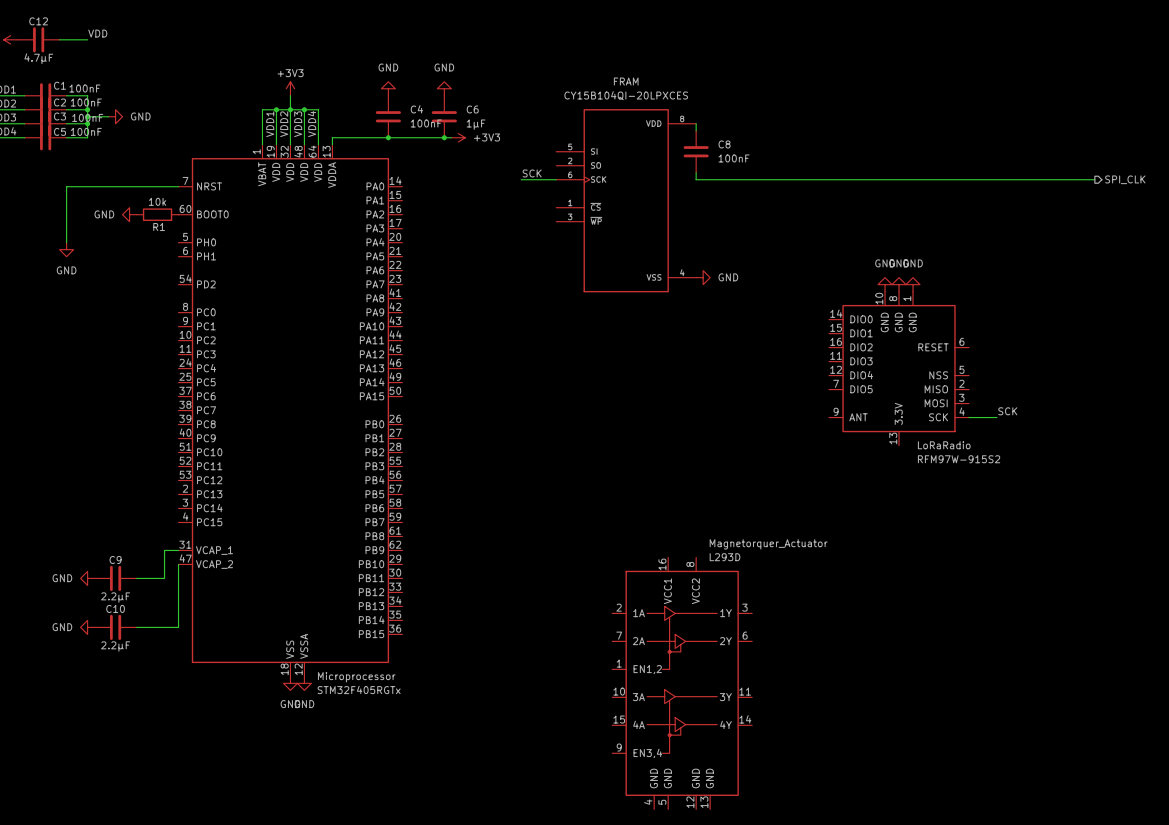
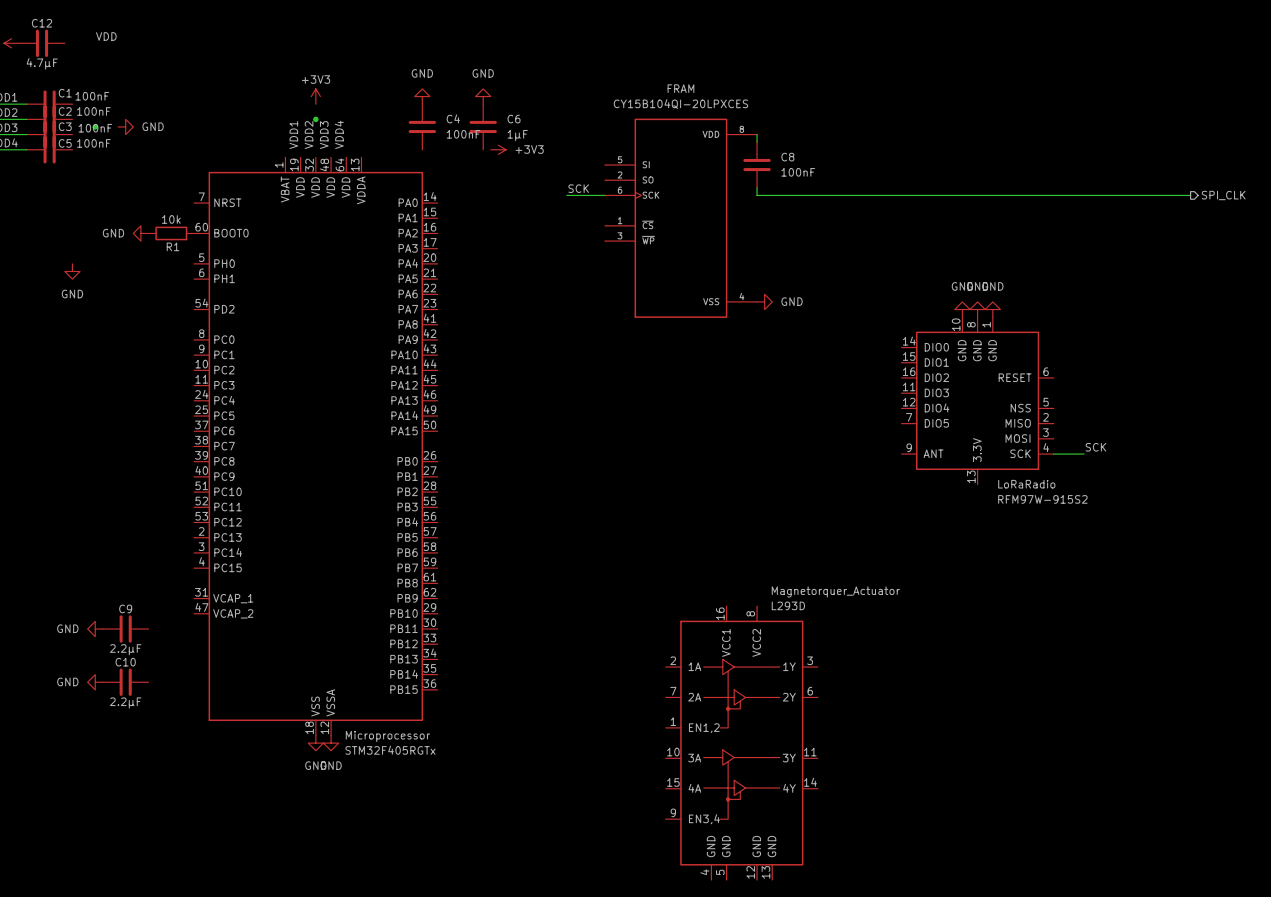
wire: (59, 39) (87, 39) -> none
wire: (66, 95) (87, 95) (87, 137) (66, 137) -> none
wire: (290, 95) (290, 144) -> none
wire: (66, 109) (87, 109) -> none
junction: (87, 109) -> none
wire: (276, 109) (276, 144) -> none
junction: (276, 109) -> none
wire: (304, 109) (304, 144) -> none
junction: (304, 109) -> none
wire: (87, 116) (108, 116) -> none
wire: (66, 123) (87, 123) -> none
junction: (87, 123) -> none
junction: (388, 137) -> none
junction: (444, 137) -> none
wire: (451, 137) (332, 137) (332, 144) -> none
wire: (262, 144) (262, 109) (318, 109) (318, 144) -> none
wire: (178, 186) (66, 186) (66, 242) -> none
wire: (178, 550) (164, 550) (164, 578) (136, 578) -> none
wire: (178, 564) (178, 627) (136, 627) -> none

